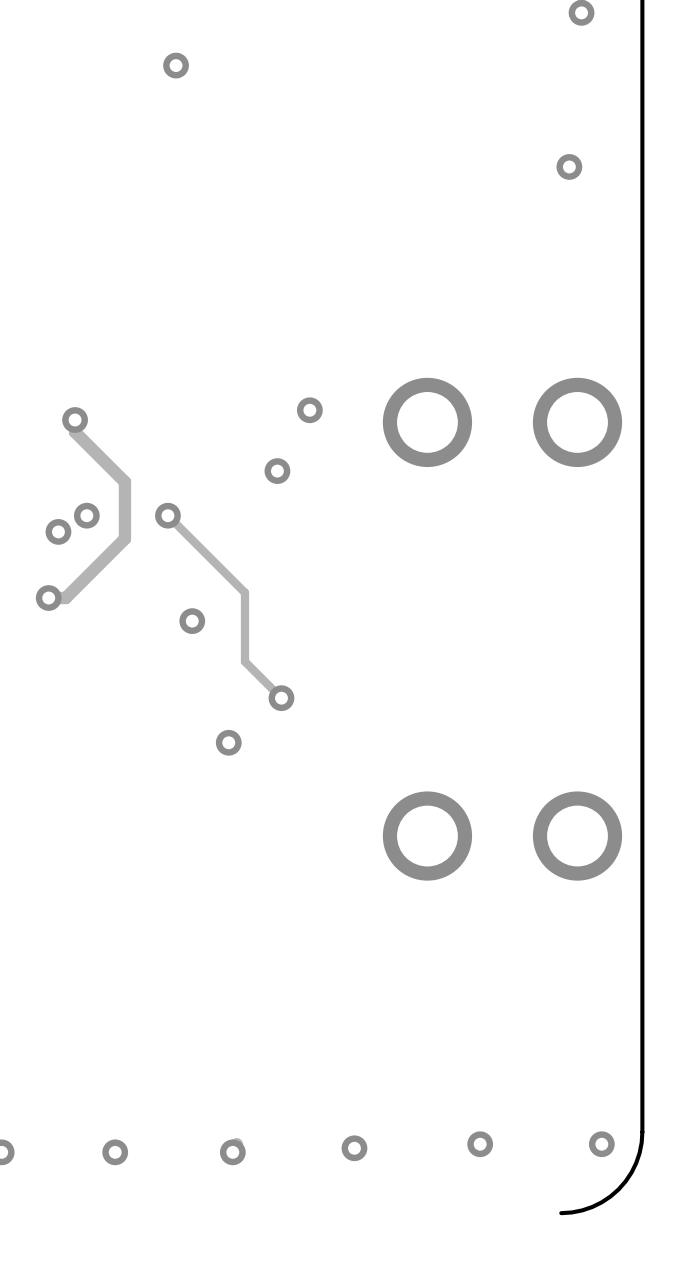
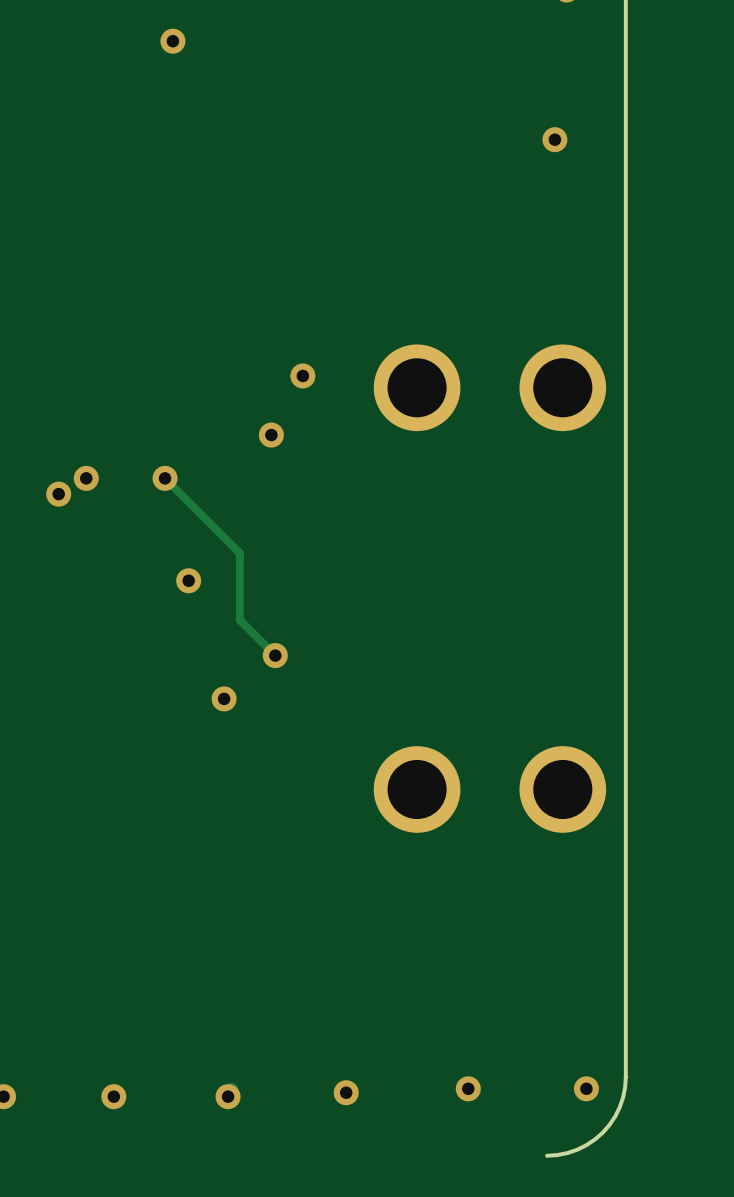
track: (75, 419) (75, 432) (124, 482) (124, 538) (65, 598) (48, 598) -> none
via: (75, 419) -> none
via: (48, 598) -> none

